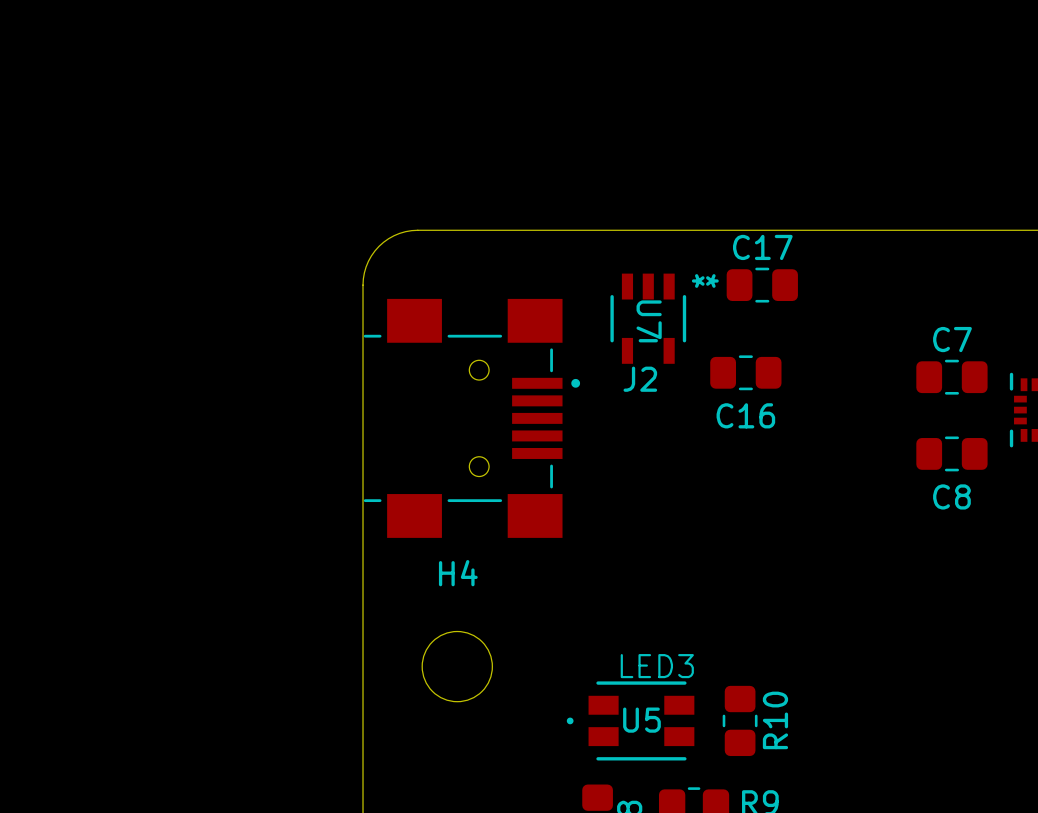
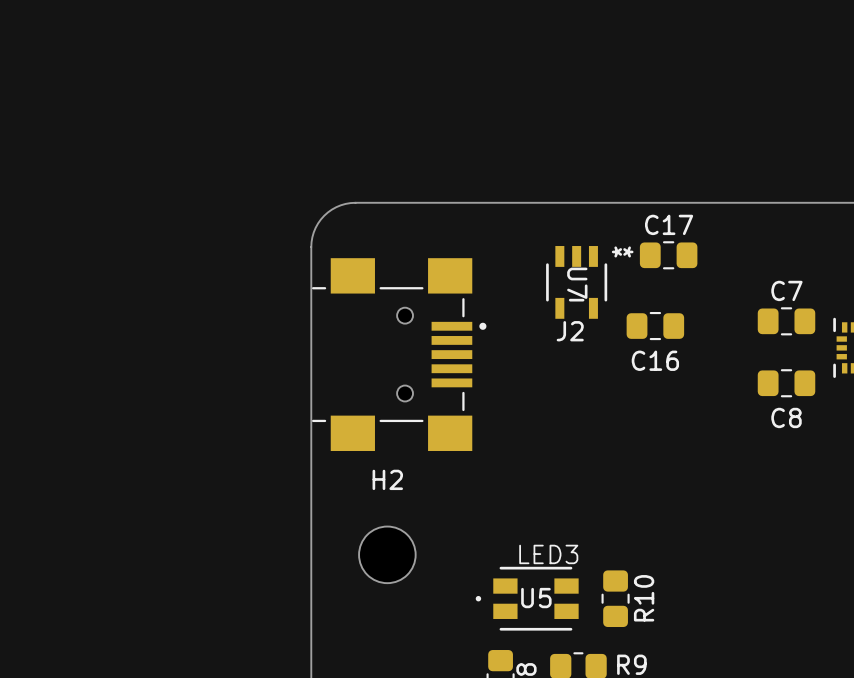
C17 position: (762, 285) -> (668, 255)
U7 position: (648, 318) -> (576, 282)
C16 position: (745, 372) -> (655, 326)
J2 name position: J2 (640, 379) -> J2 (570, 331)
H4 name: H4 (458, 573) -> H2 (387, 479)

